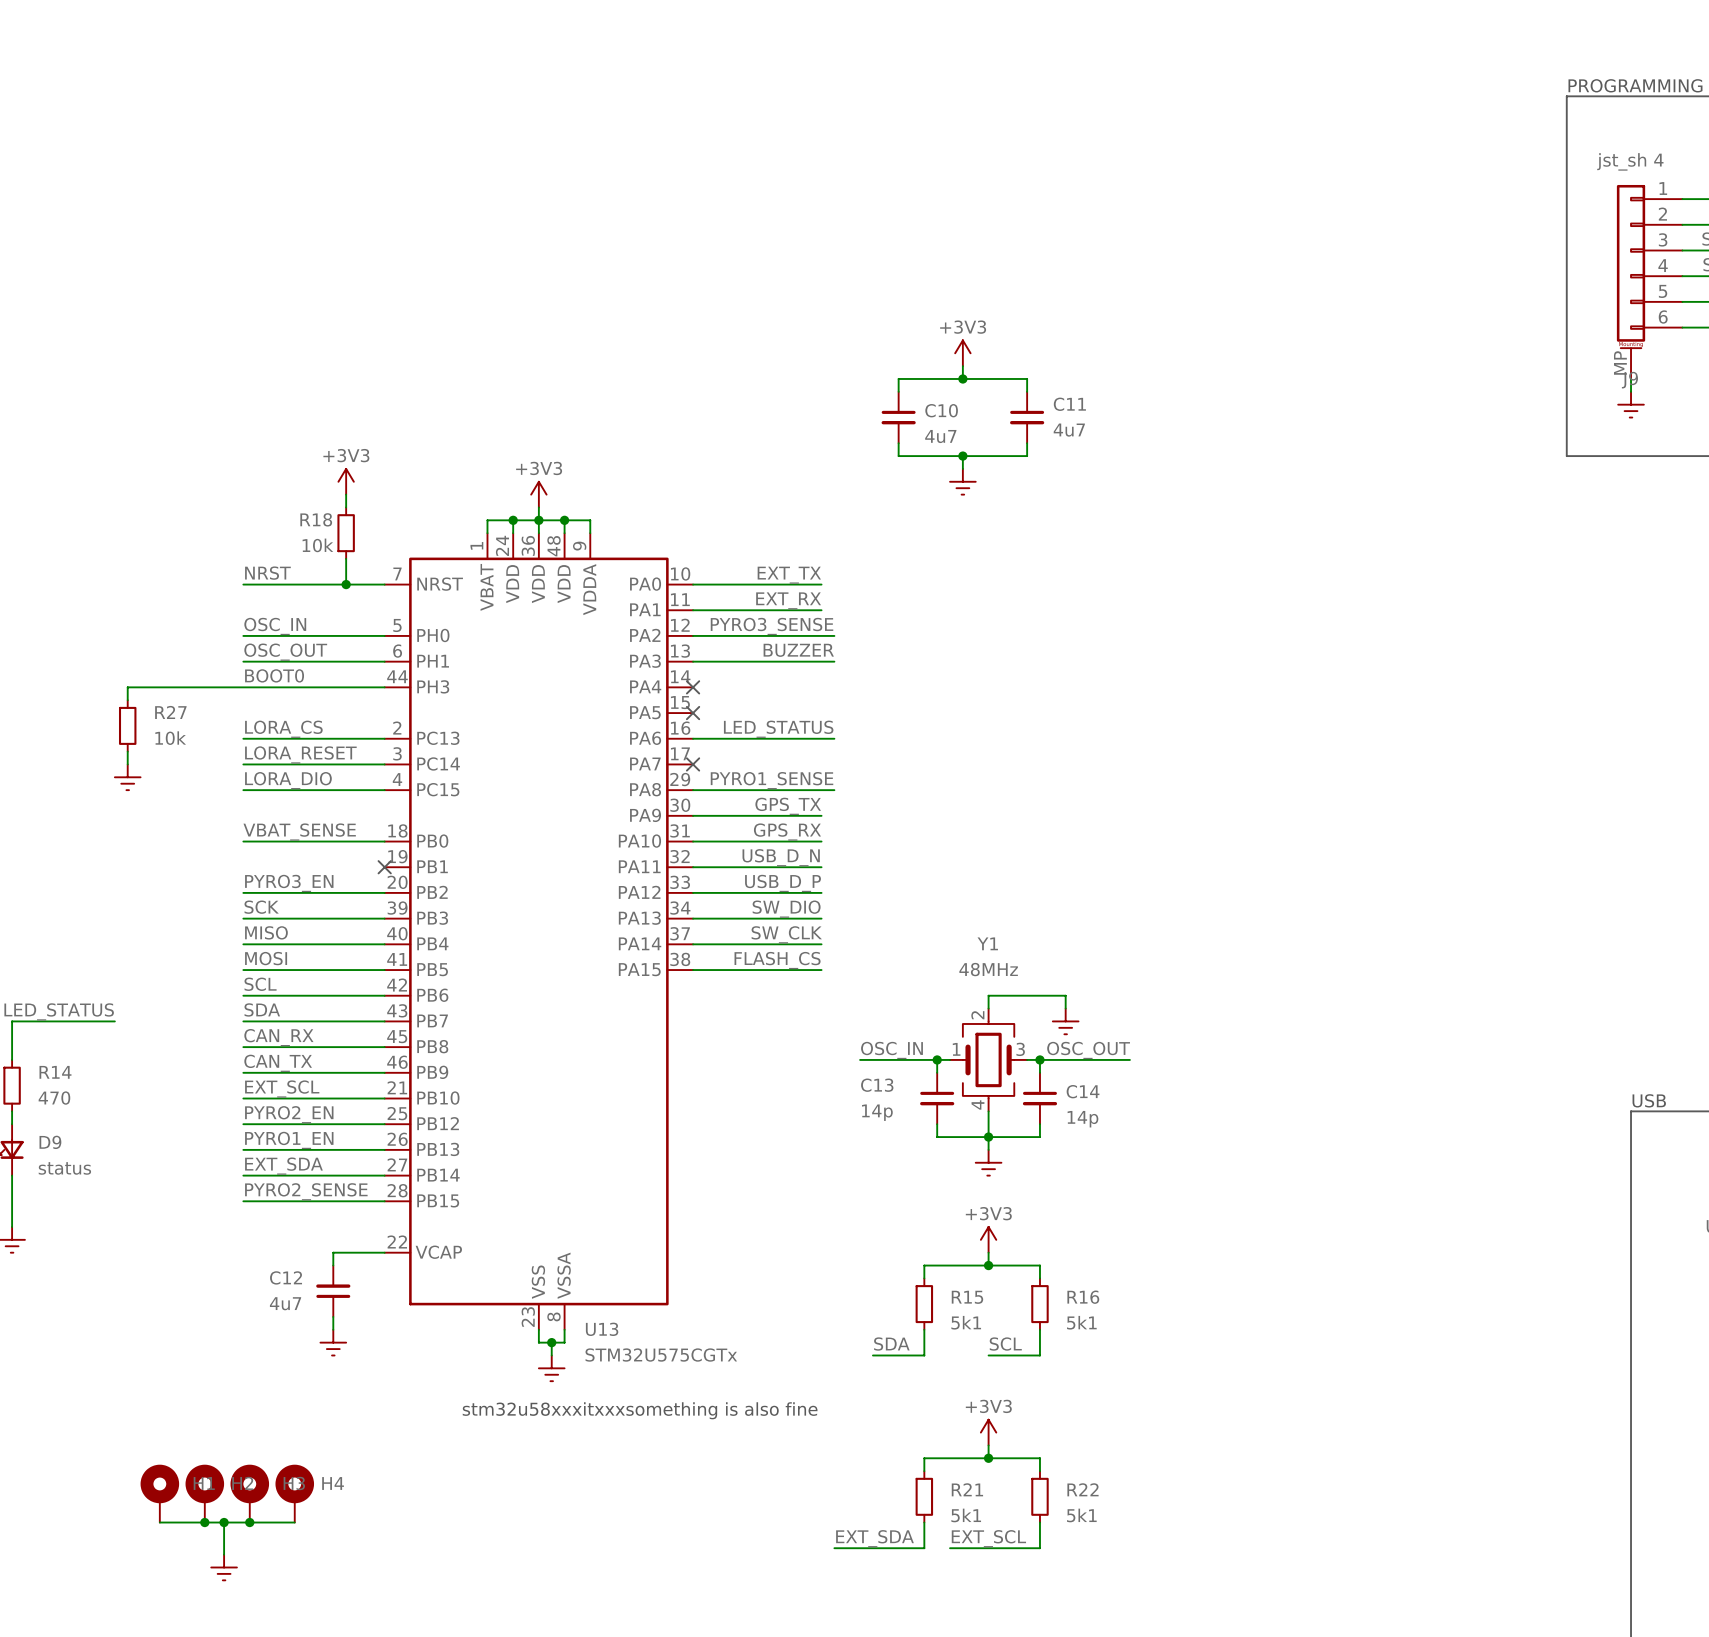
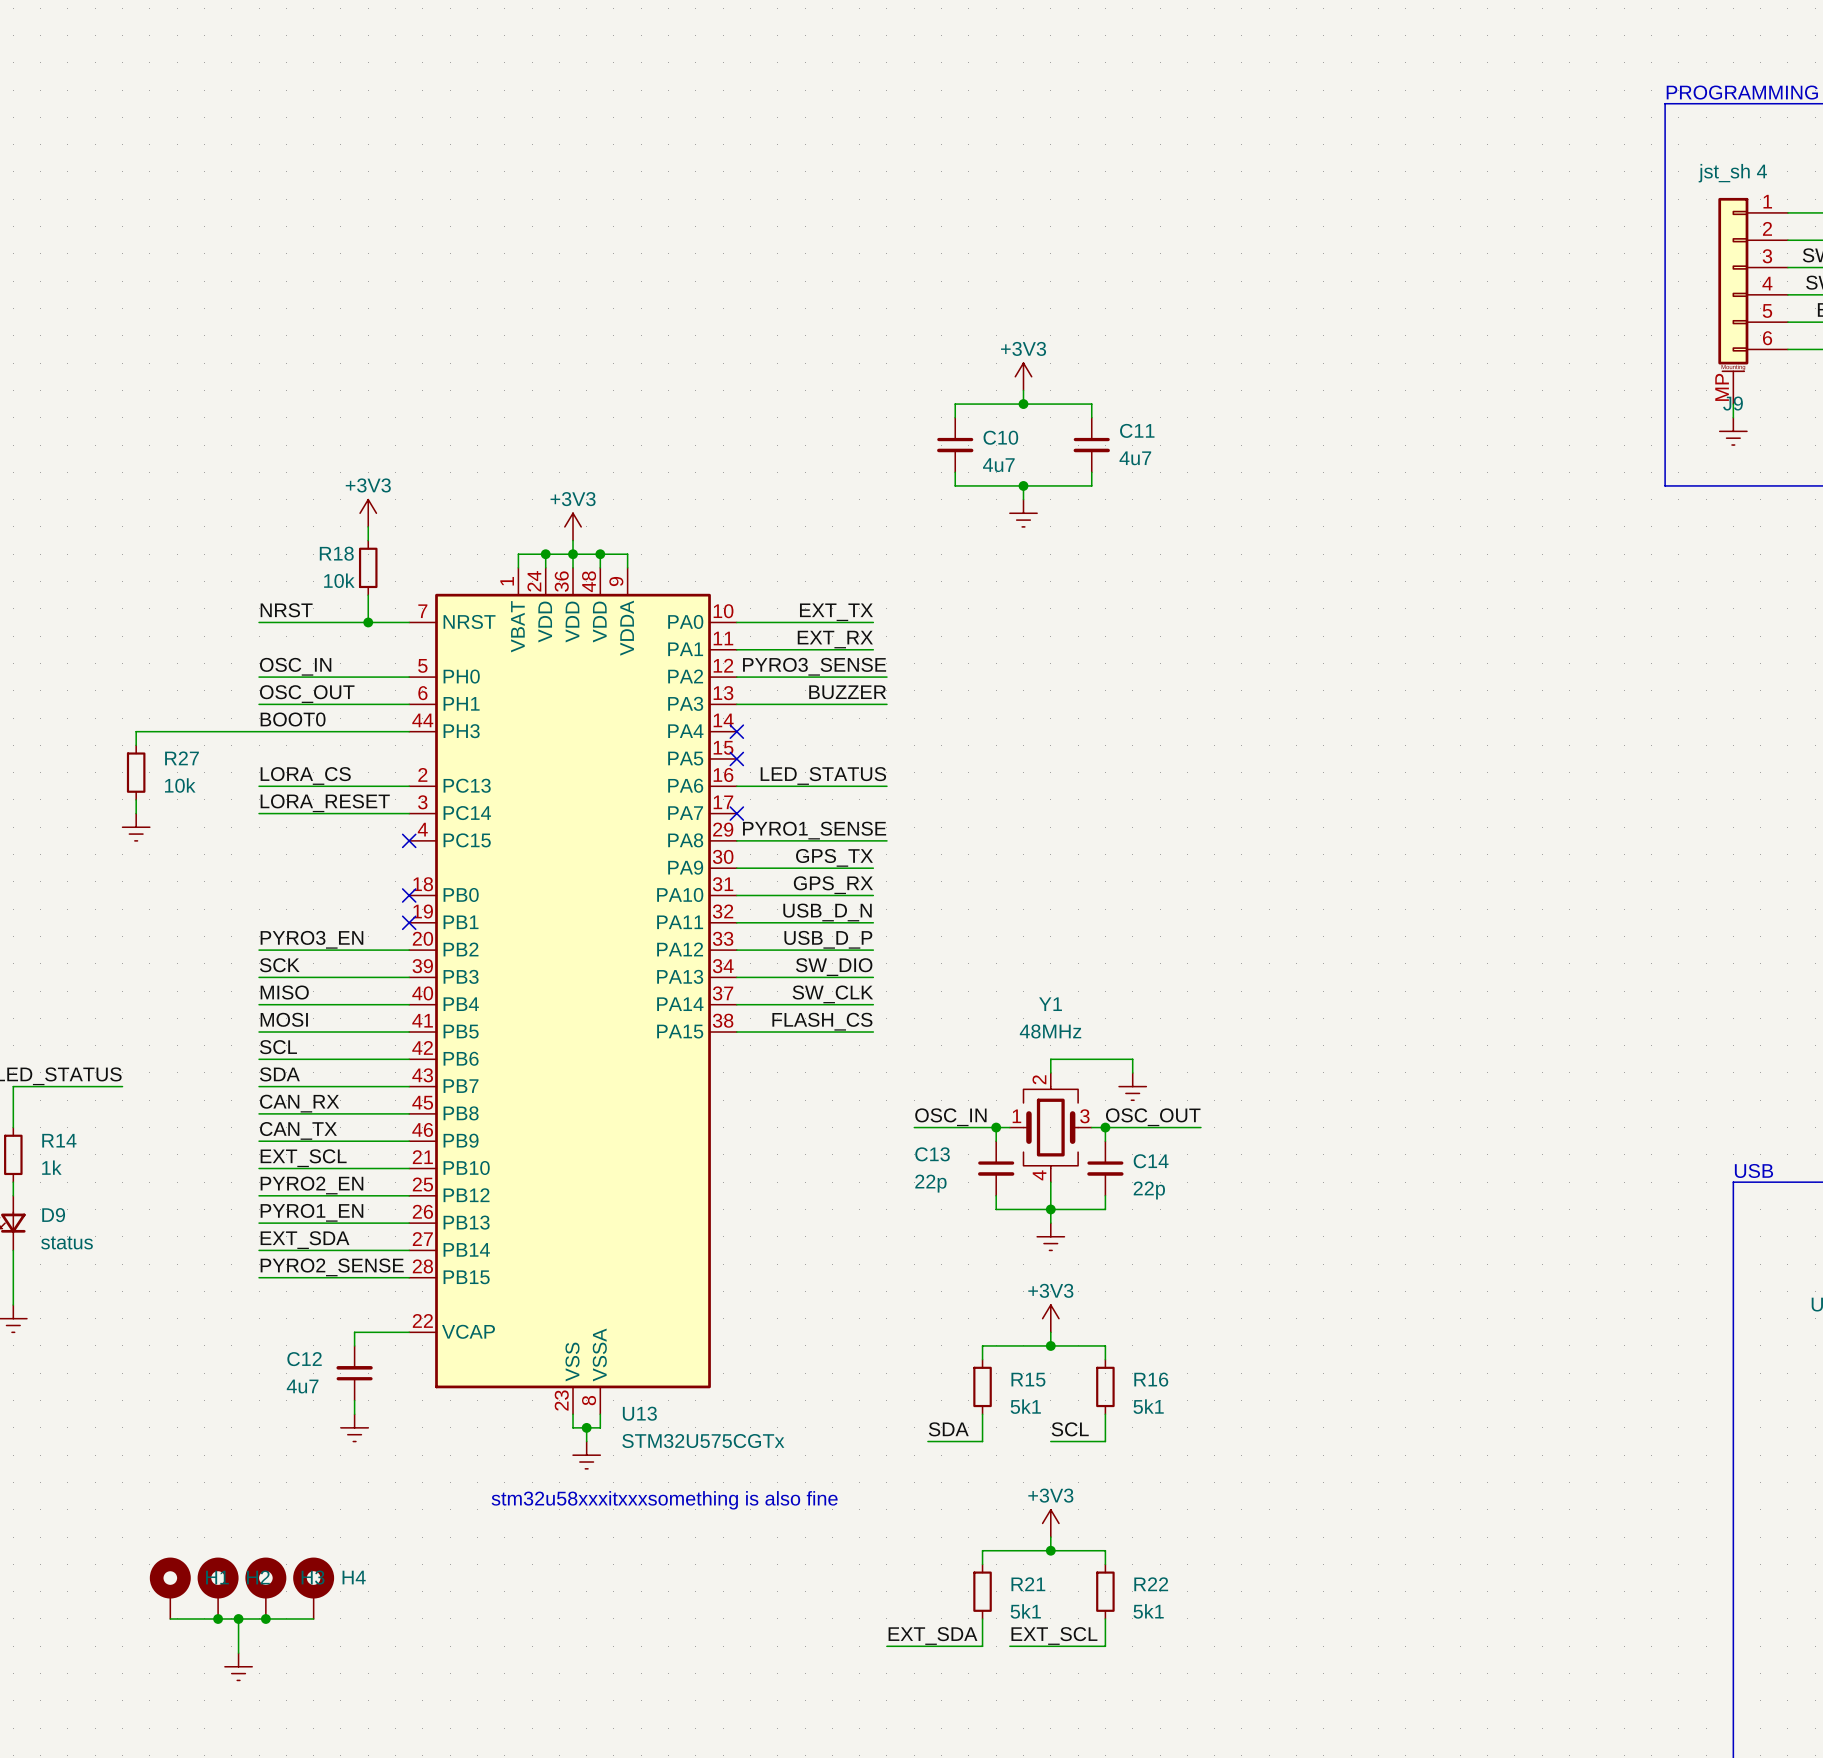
label: LORA_DIO (288, 780) -> none
wire: (243, 790) (384, 790) -> none
no-connect mark: none -> (409, 840)
label: VBAT_SENSE (299, 832) -> none
wire: (243, 841) (384, 841) -> none
no-connect mark: none -> (409, 895)
R14 value: 470 (54, 1098) -> 1k (51, 1167)
C13 value: 14p (877, 1112) -> 22p (930, 1183)
C14 value: 14p (1082, 1119) -> 22p (1149, 1190)

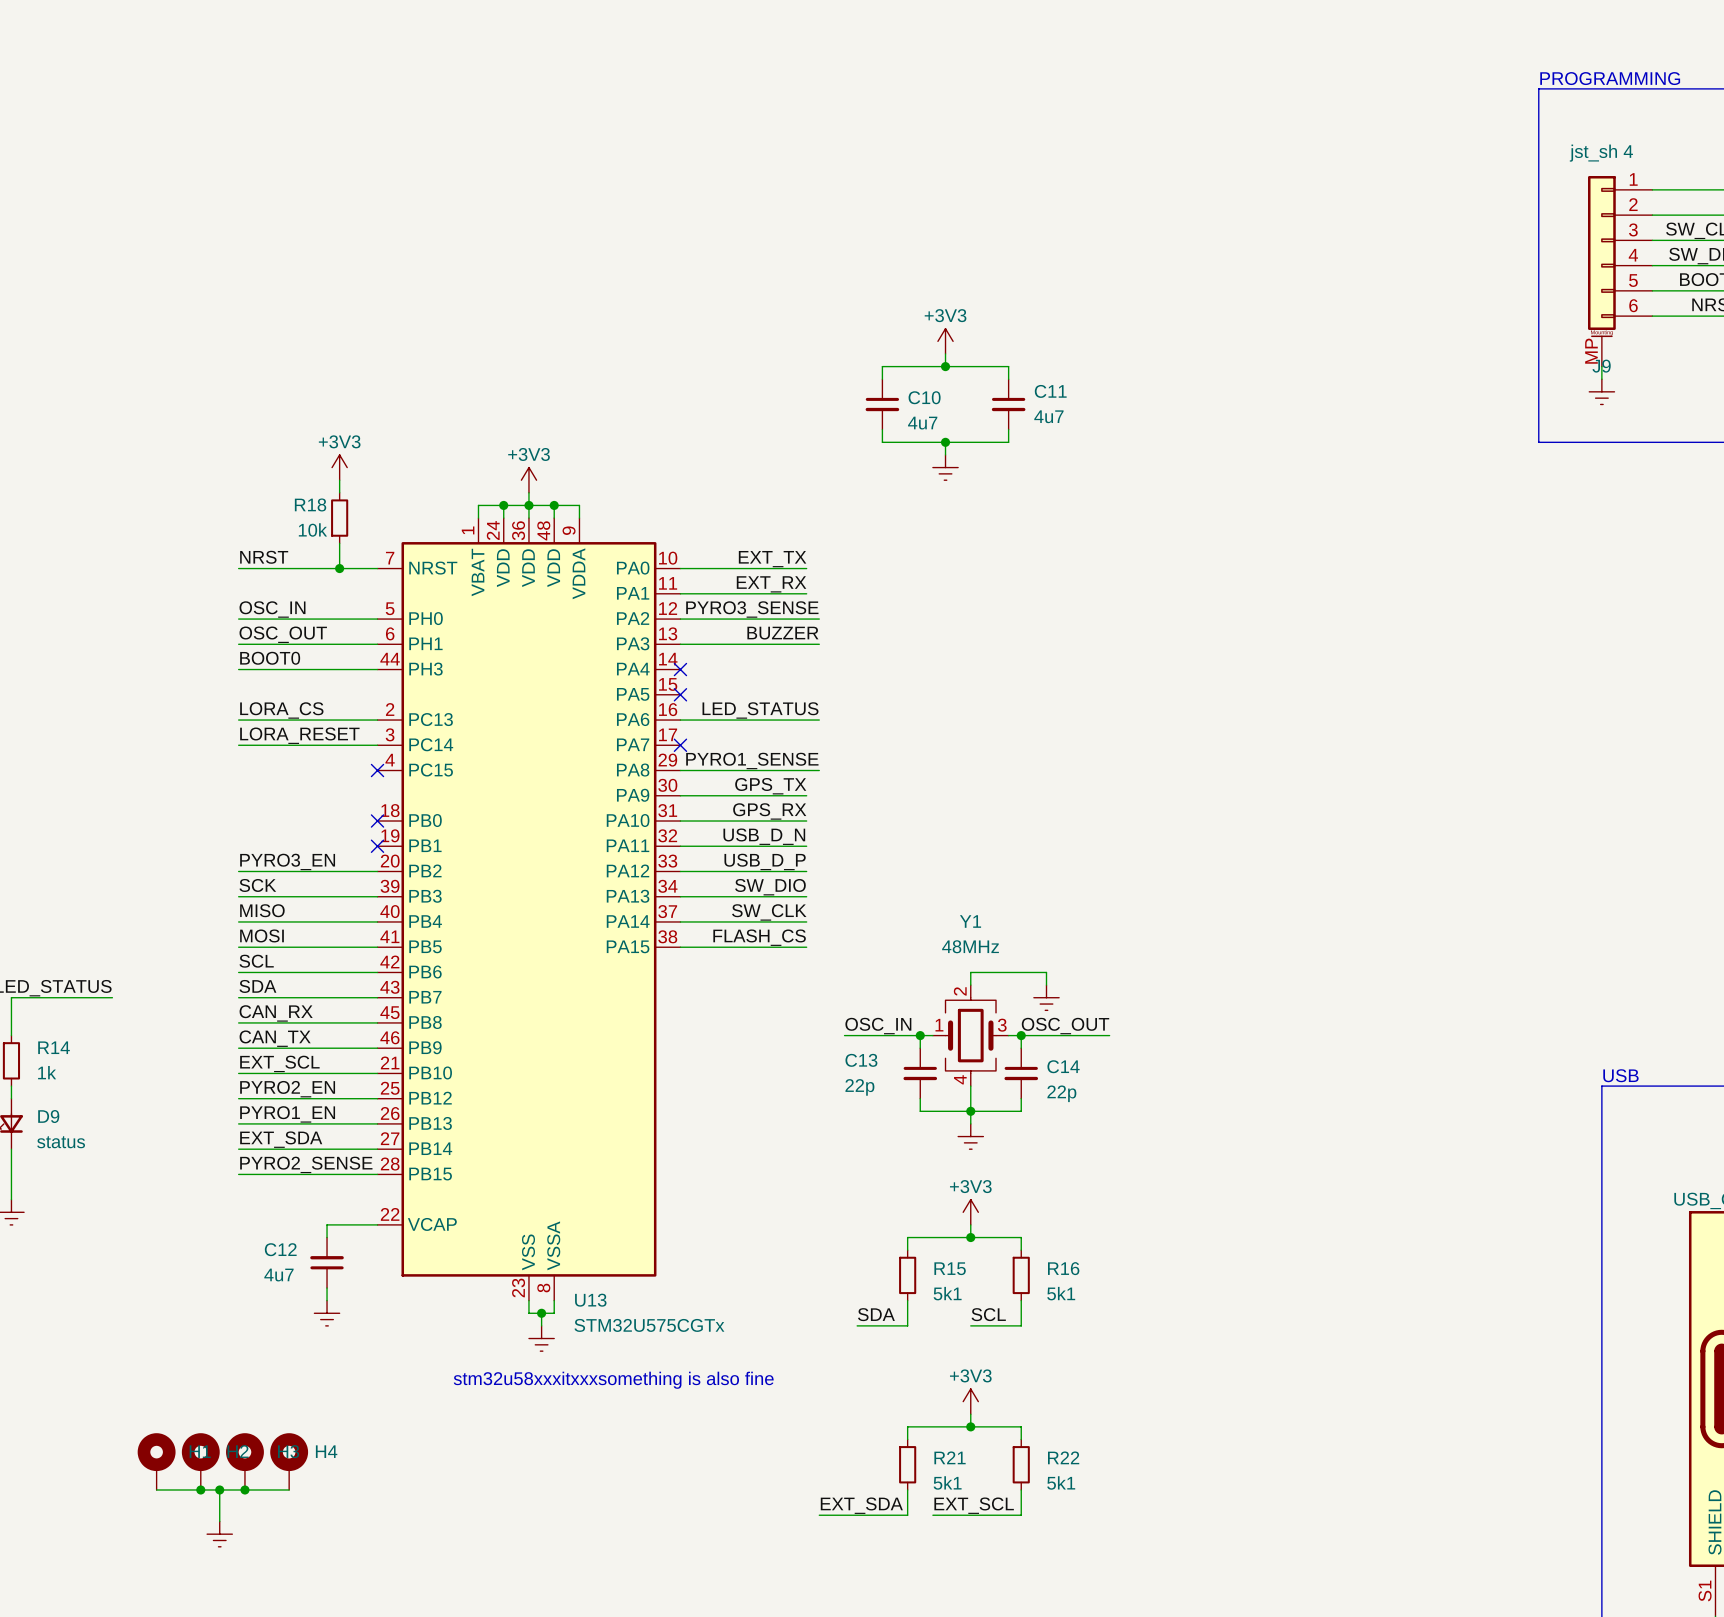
wire: (259, 731) (136, 731) (136, 745) -> none
R27: 10k (136, 772) -> none
wire: (136, 799) (136, 813) -> none
power symbol: (136, 827) -> none

